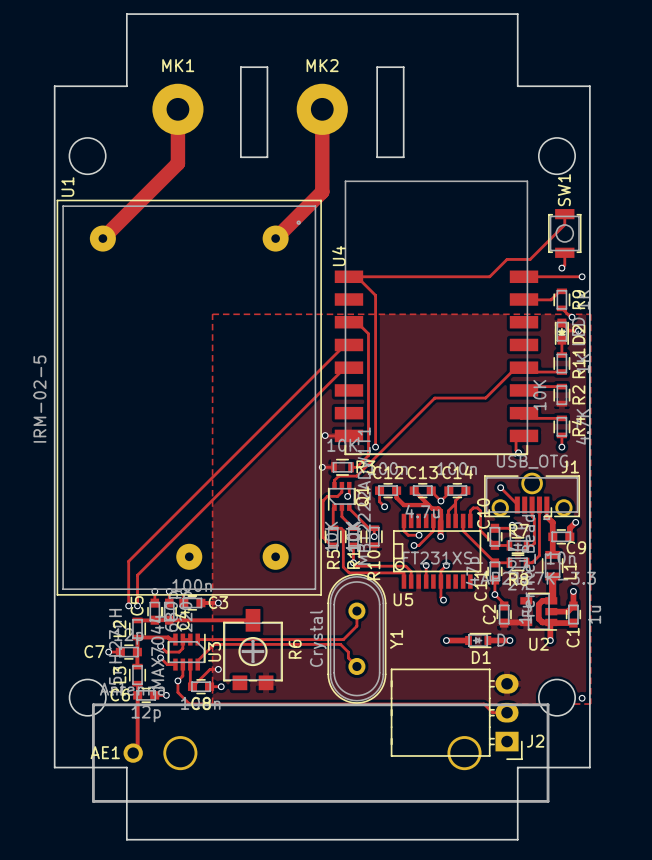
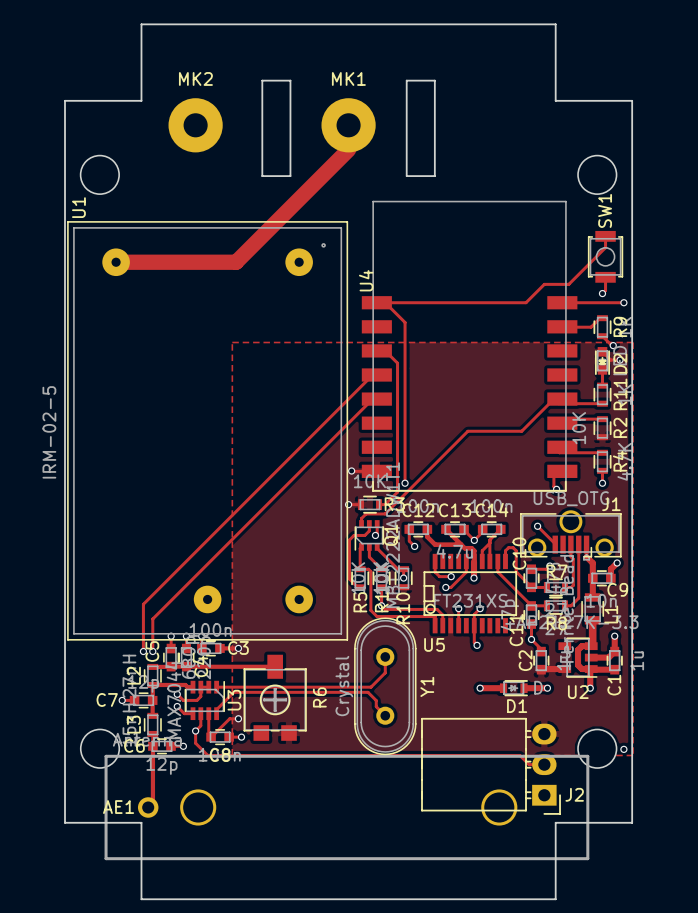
MK1 name: MK1 (178, 65) -> MK2 (195, 78)
MK2 name: MK2 (322, 65) -> MK1 (348, 78)
track: (177, 109) (177, 163) (102, 238) -> (348, 149) (236, 262) (116, 262)
track: (322, 132) (322, 191) (275, 238) -> none

